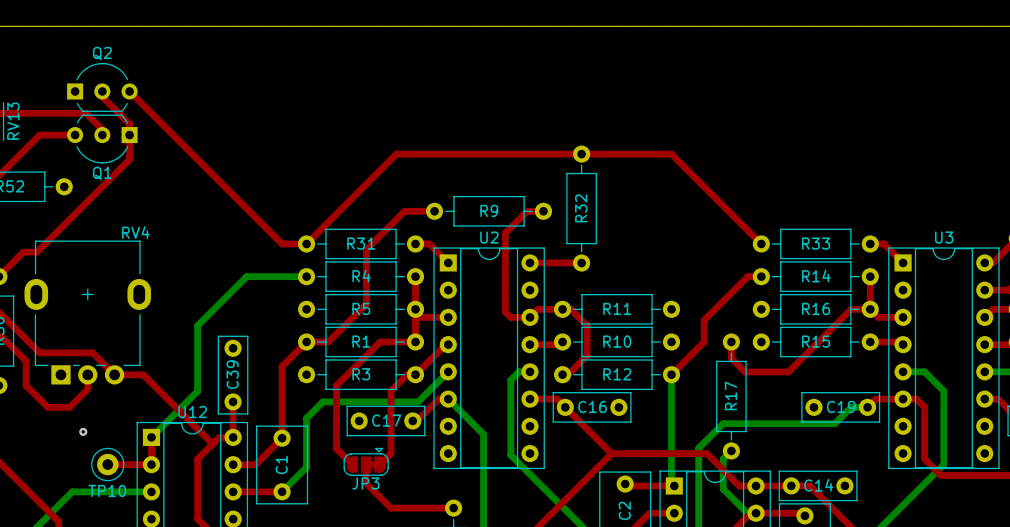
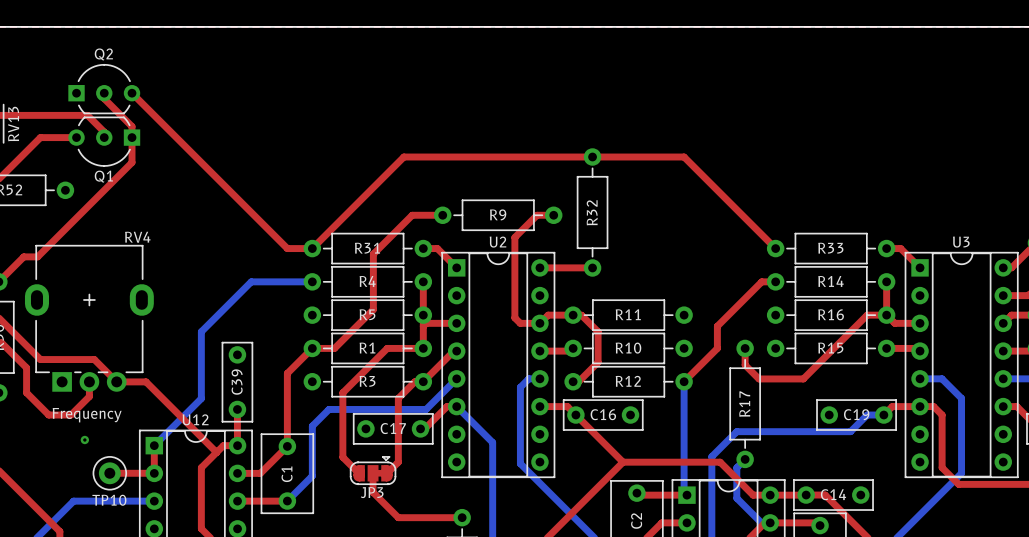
text: none -> Frequency (87, 415)

